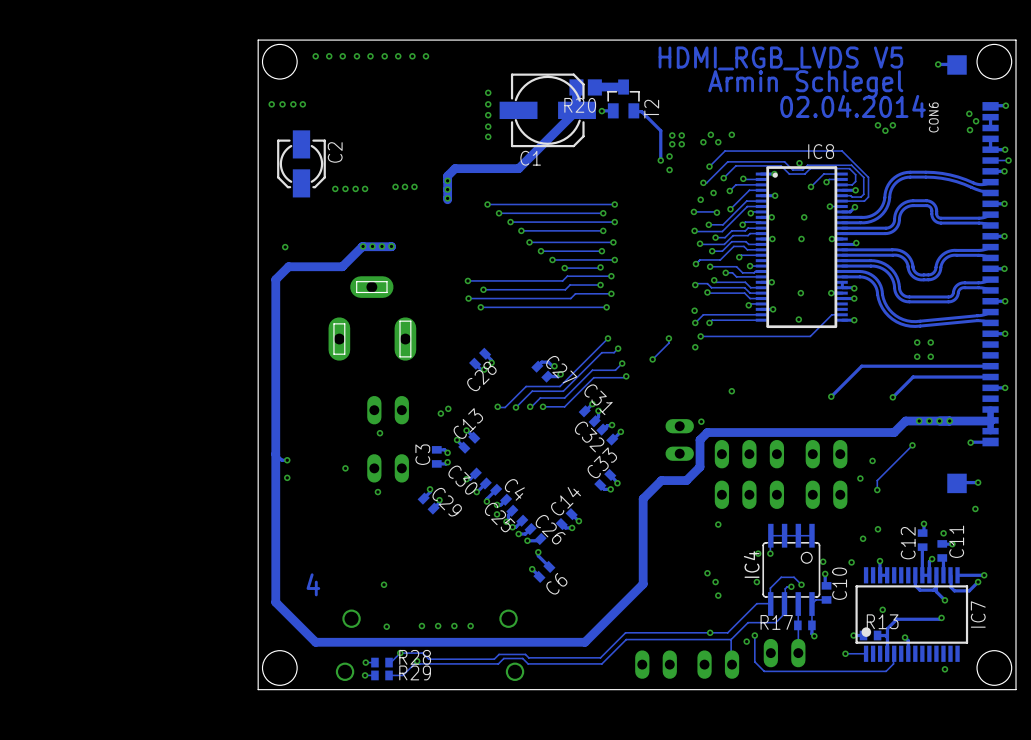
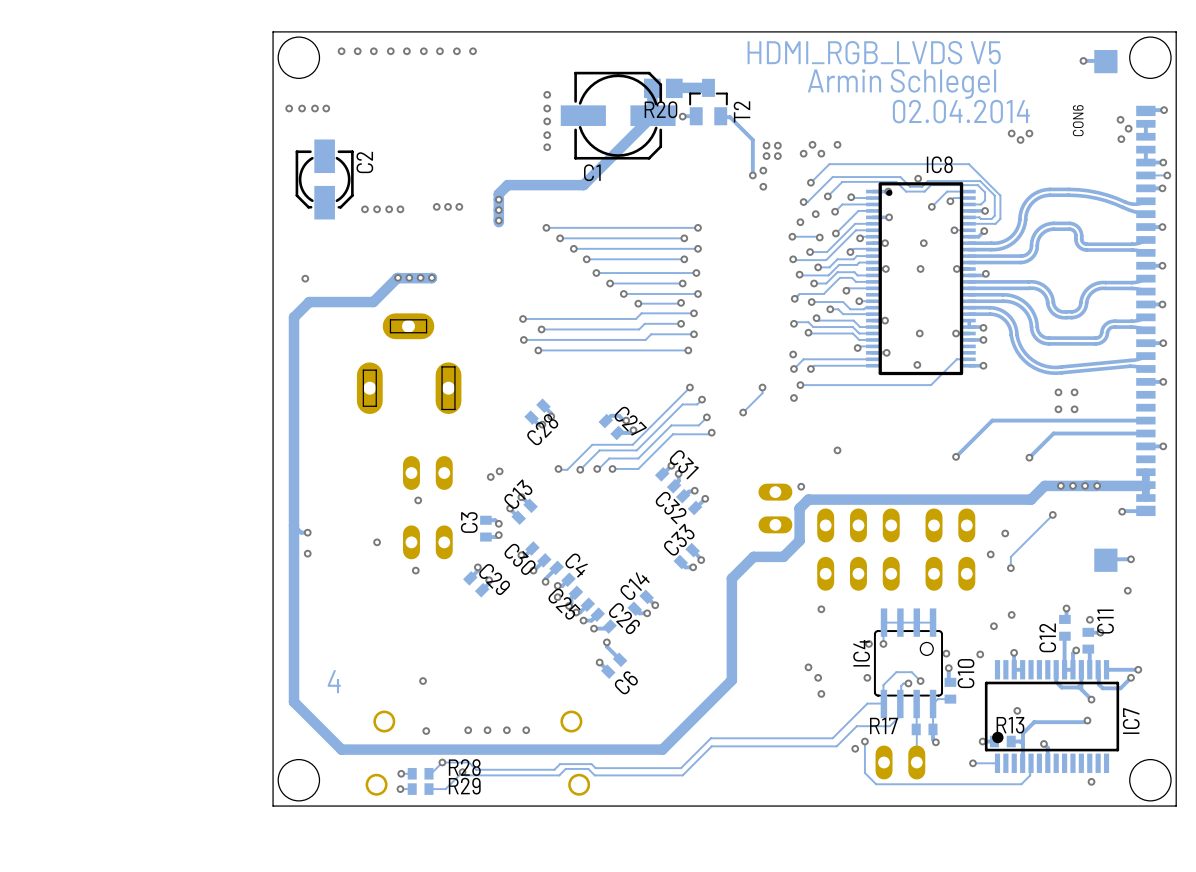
via: (710, 632) -> none
track: (731, 639) (732, 664) -> none
part: (656, 664) -> none
part: (718, 664) -> none

